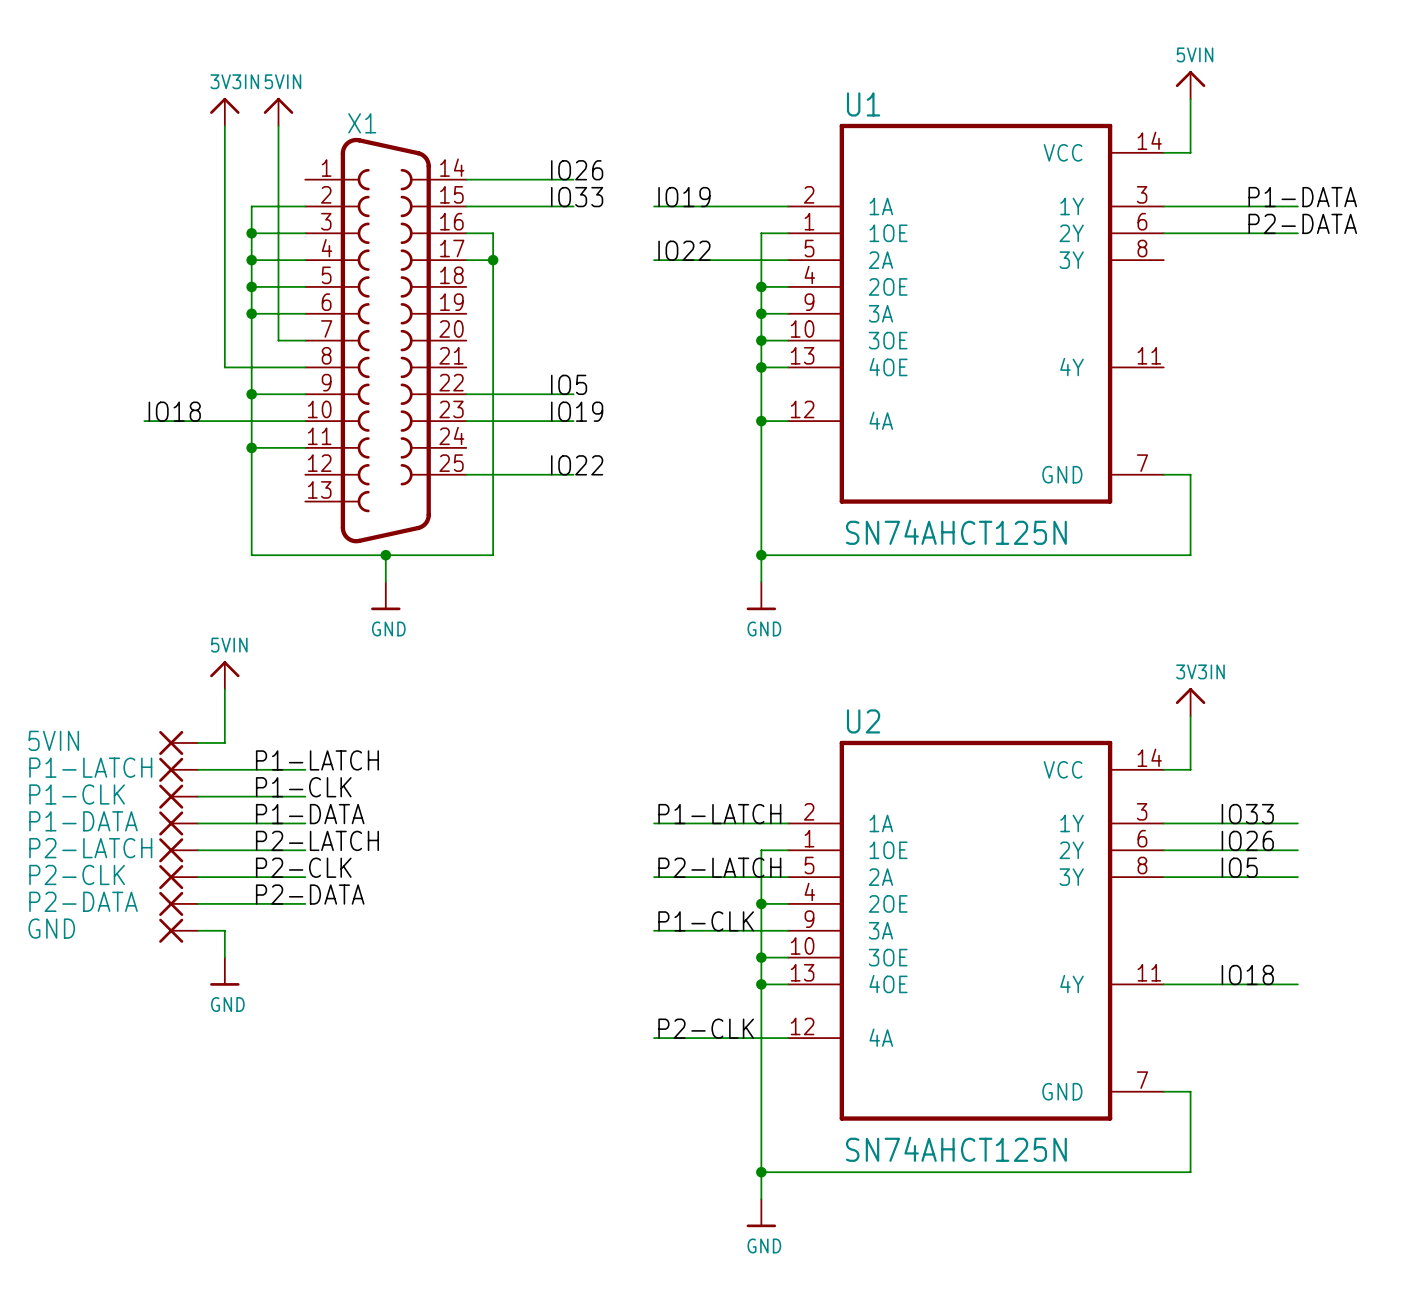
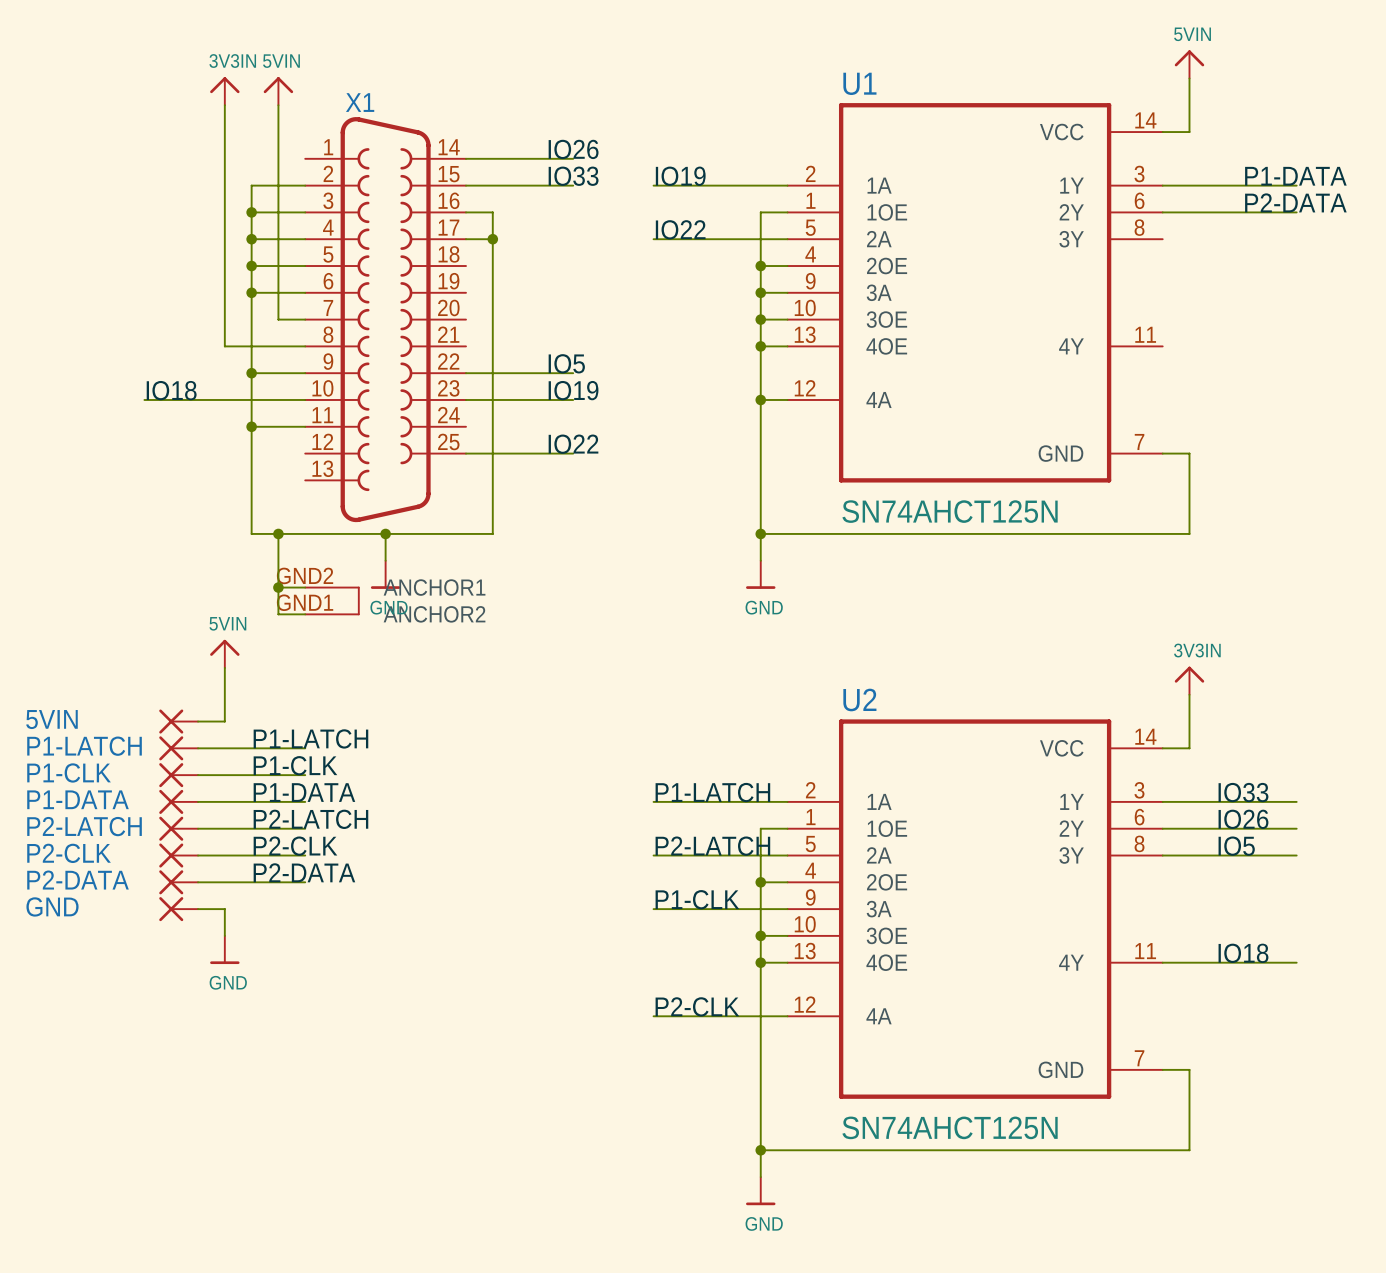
X1 symbol: [305, 137, 467, 544] -> [305, 117, 467, 616]
wire: none -> (278, 533) (278, 614) (305, 614)
junction: none -> (278, 533)
wire: none -> (278, 587) (305, 587)
junction: none -> (278, 587)

